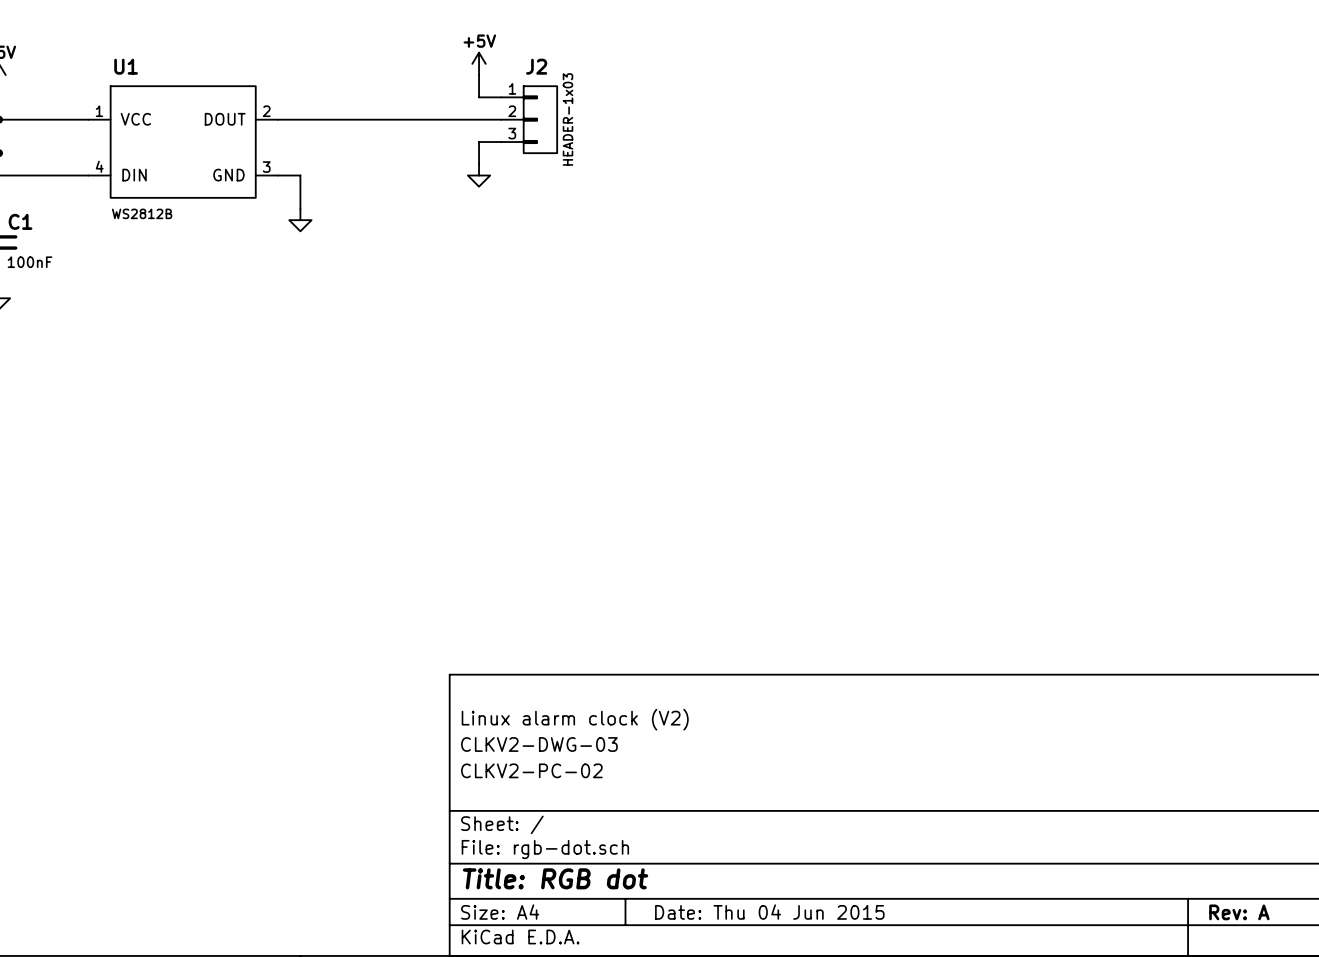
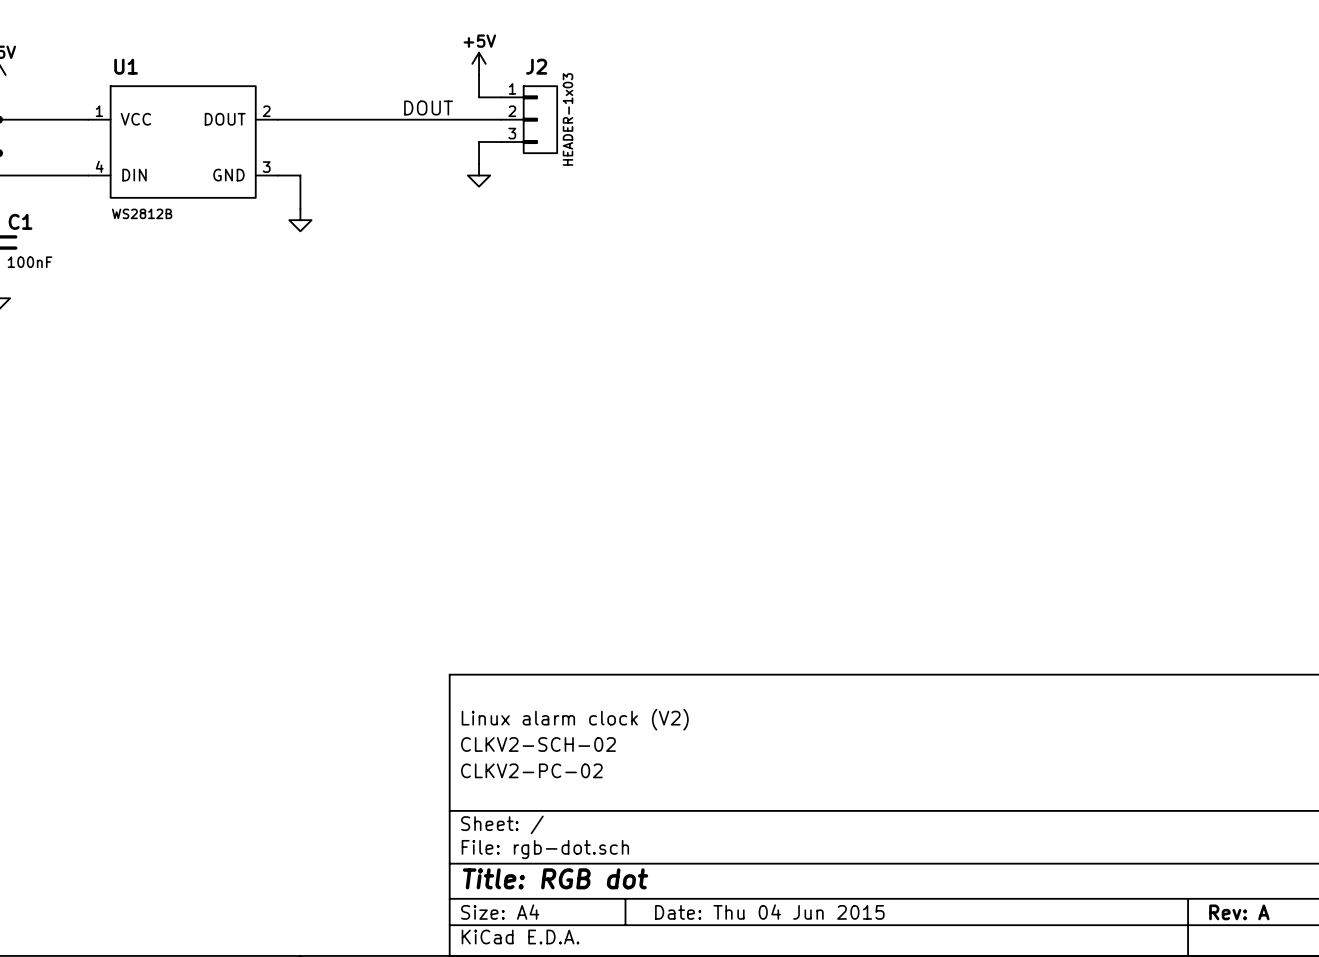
label: none -> DOUT (428, 108)
title block: CLKV2-DWG-03 (539, 744) -> CLKV2-SCH-02 (538, 744)

